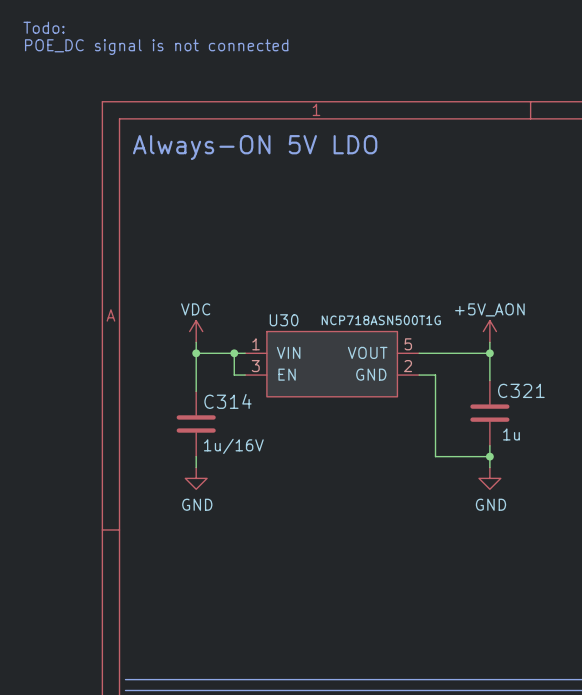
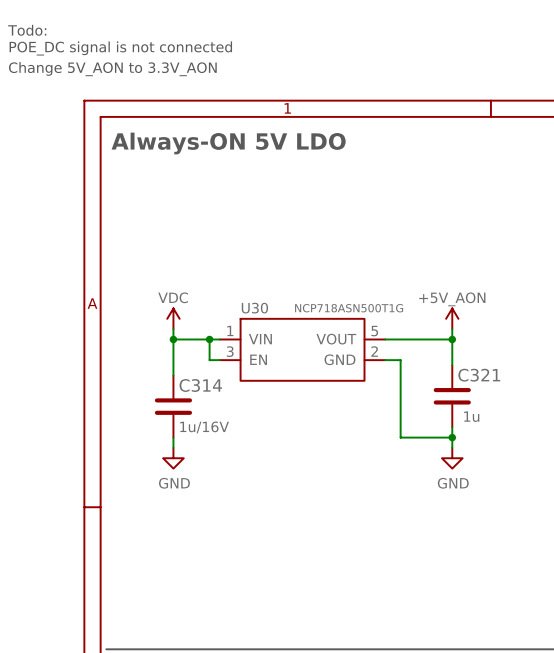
text: none -> Change 5V_AON to 3.3V_AON (112, 69)

